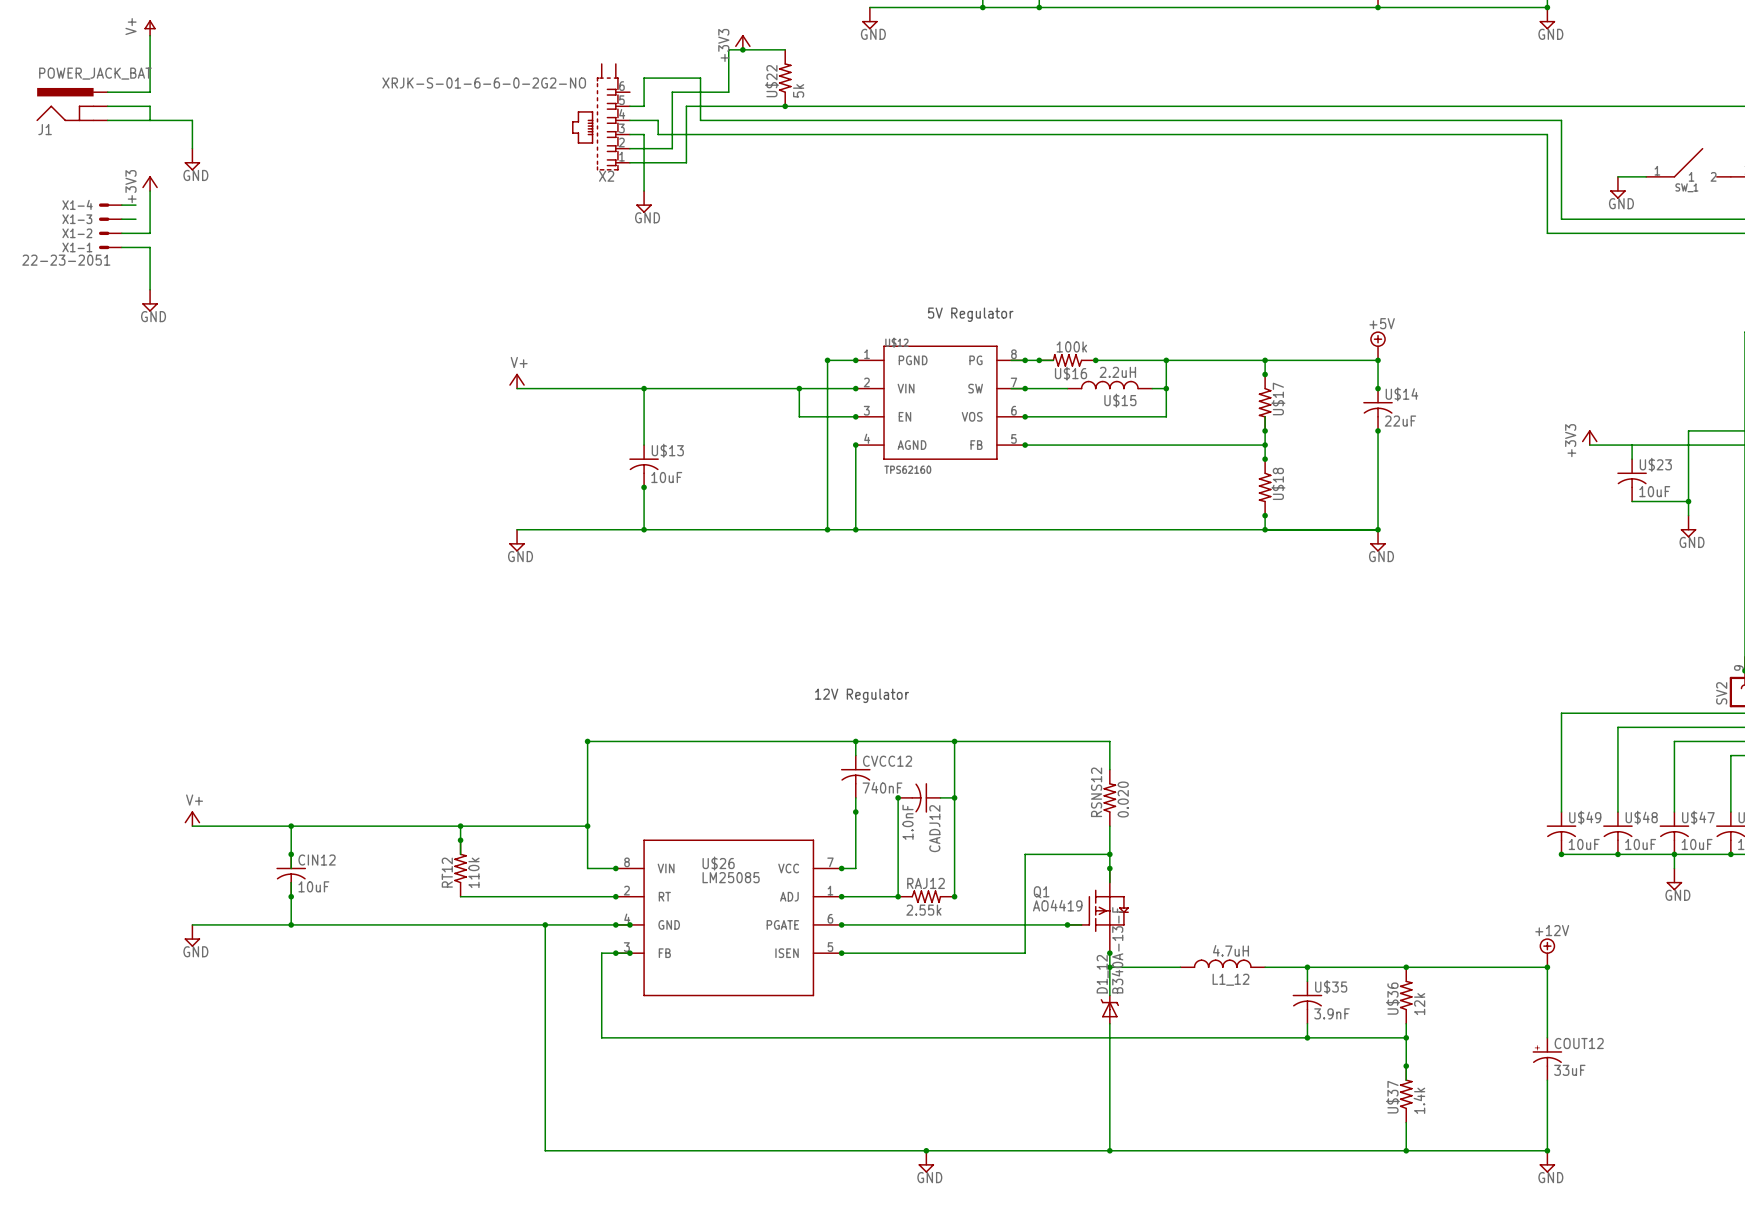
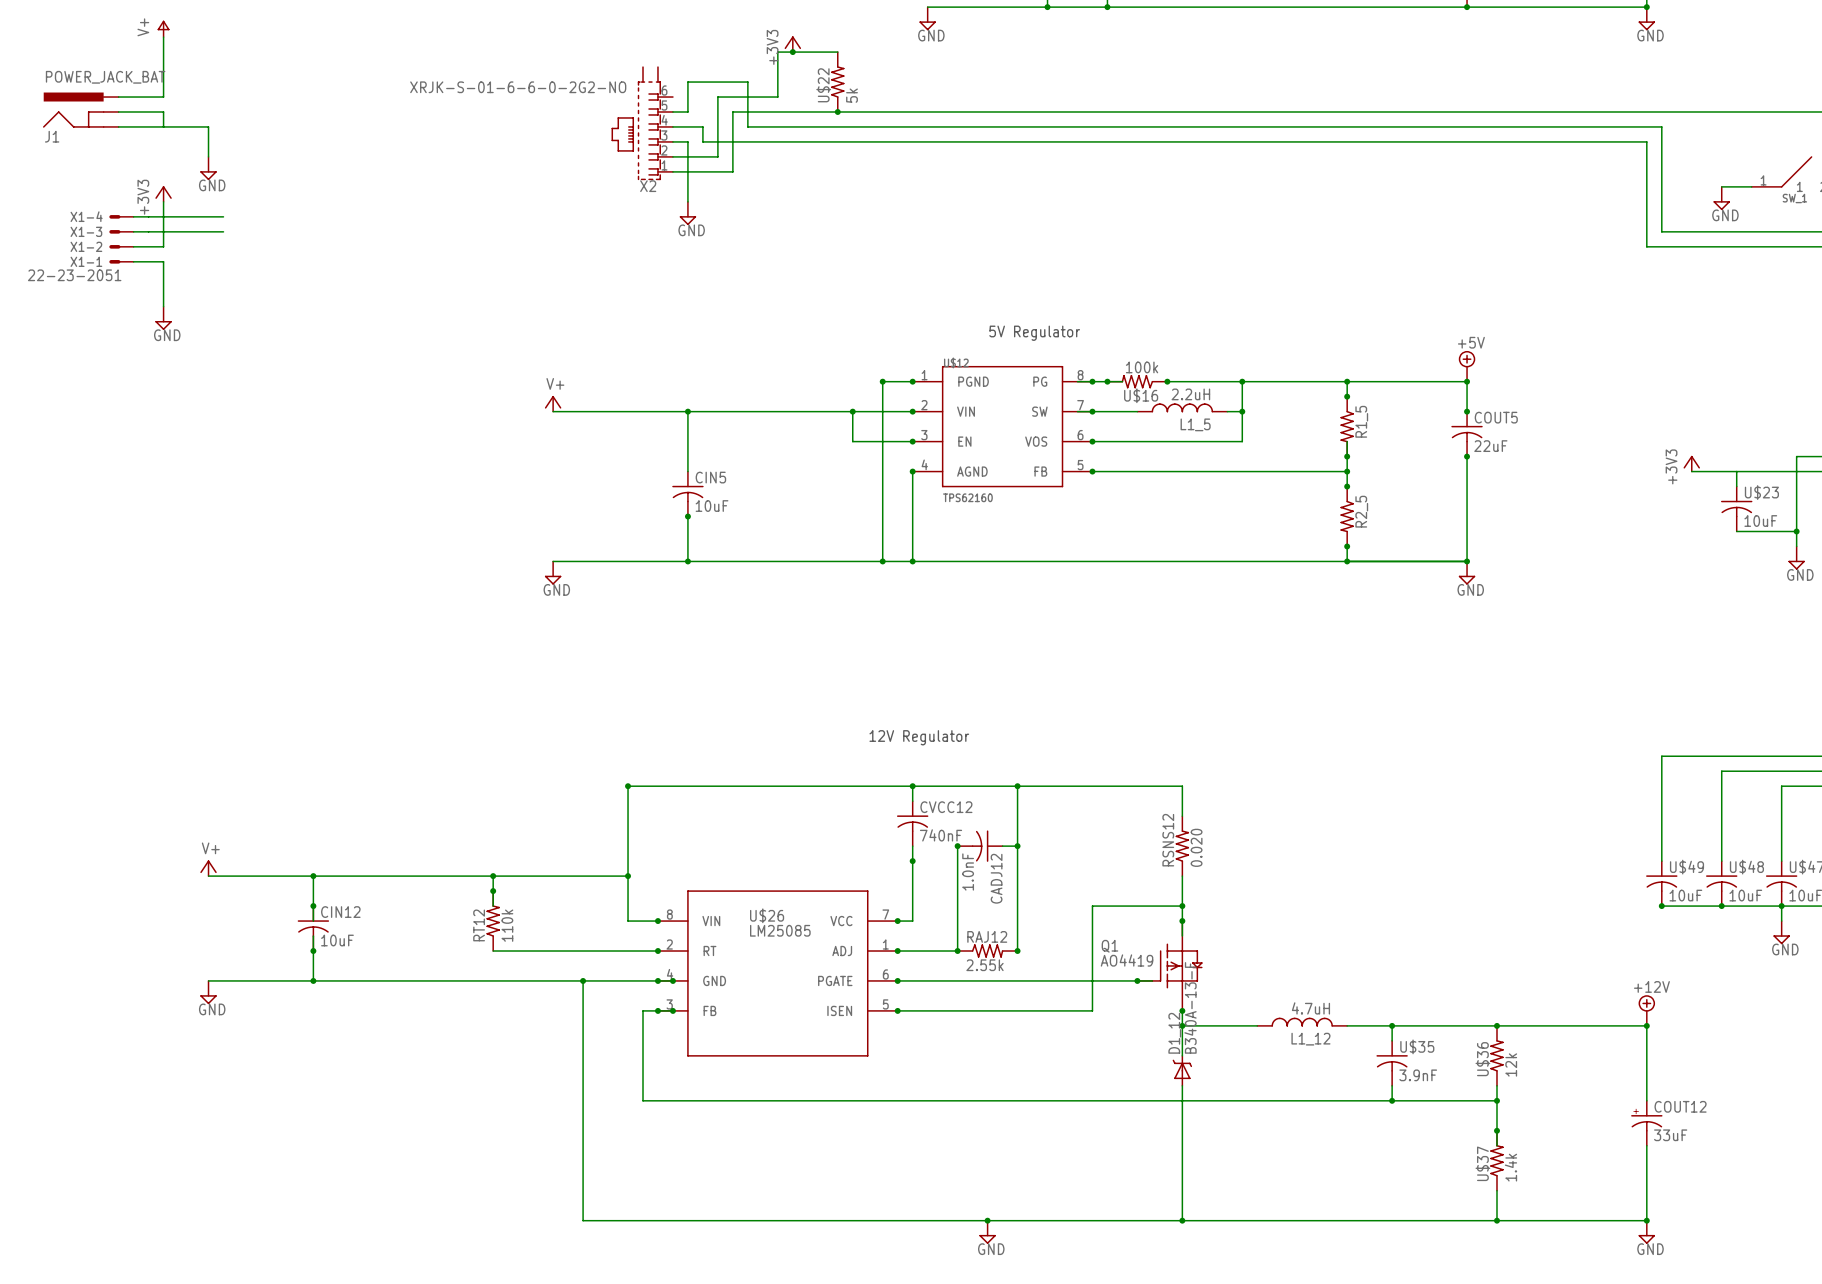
wire: none -> (148, 216) (223, 216)
wire: none -> (148, 231) (223, 231)
U$14 name: U$14 (1401, 394) -> COUT5 (1496, 417)
U$17 name: U$17 (1278, 398) -> R1_5 (1361, 421)
U$15 name: U$15 (1120, 400) -> L1_5 (1195, 424)
U$13 name: U$13 (667, 450) -> CIN5 (710, 477)
U$18 name: U$18 (1278, 483) -> R2_5 (1361, 511)

